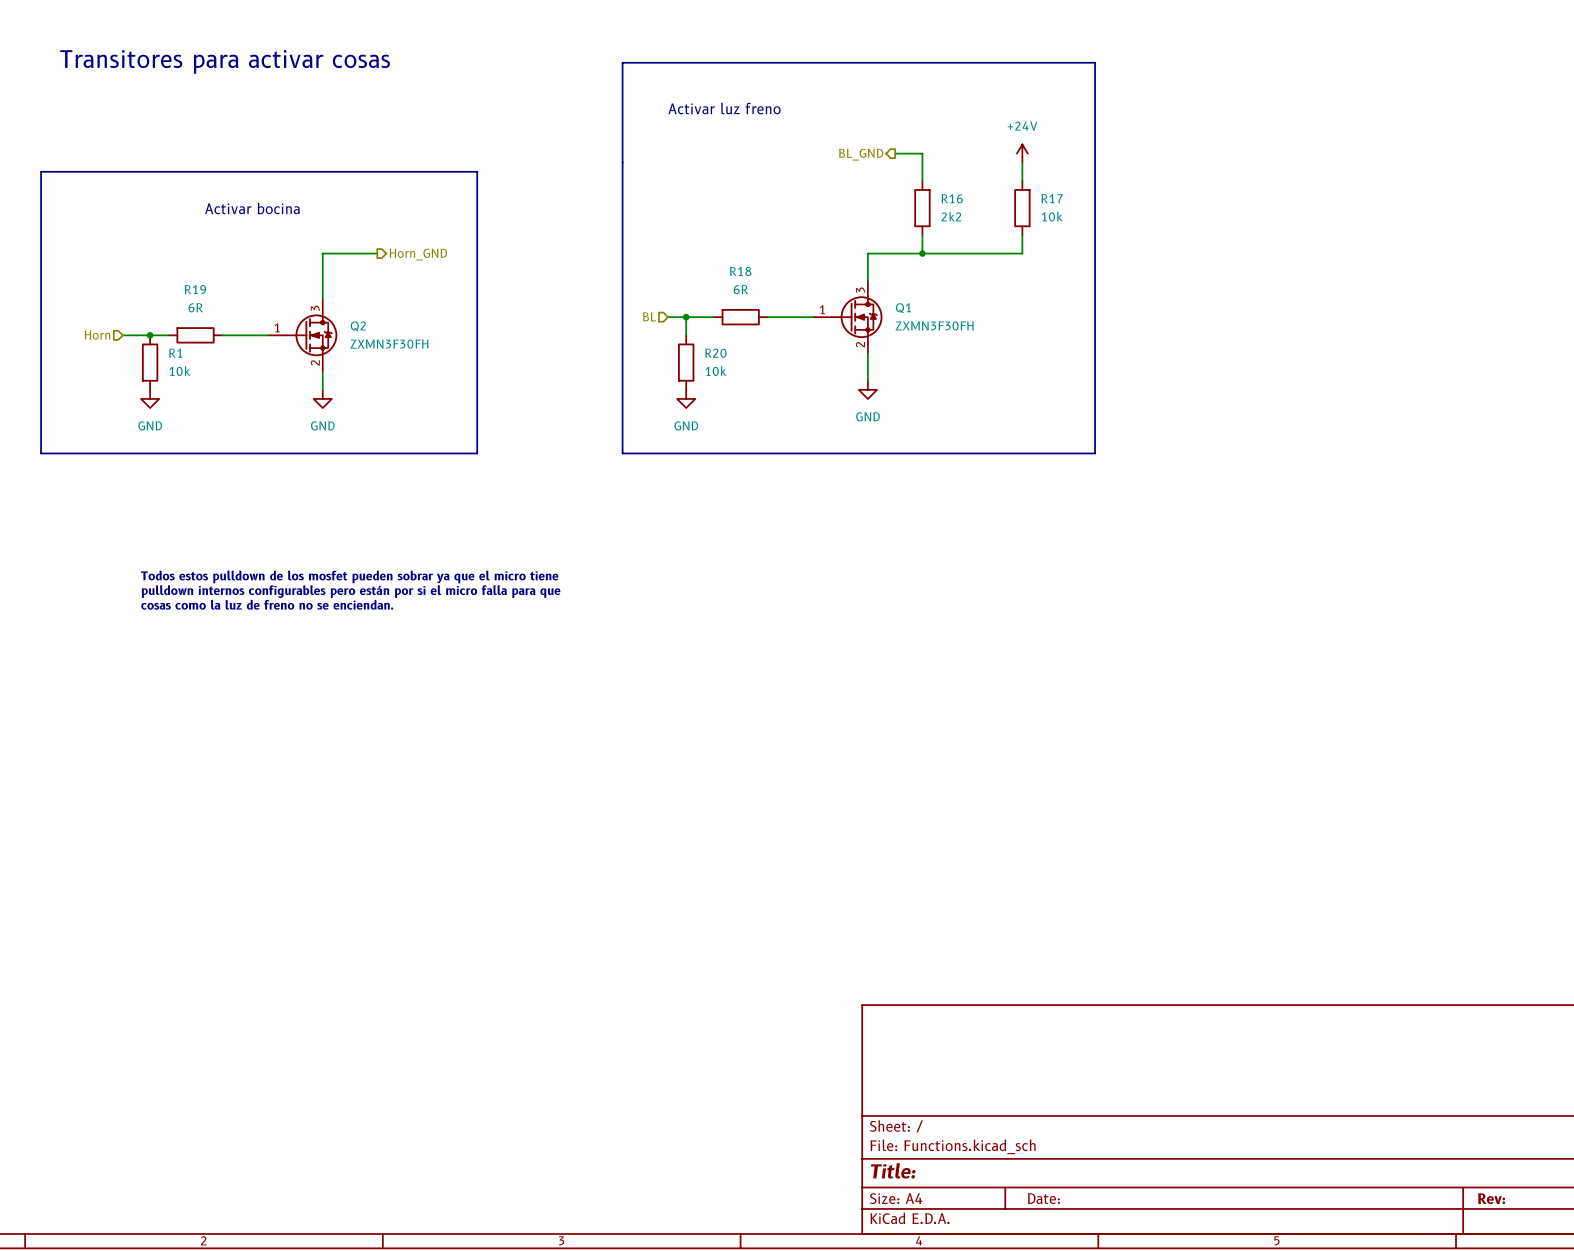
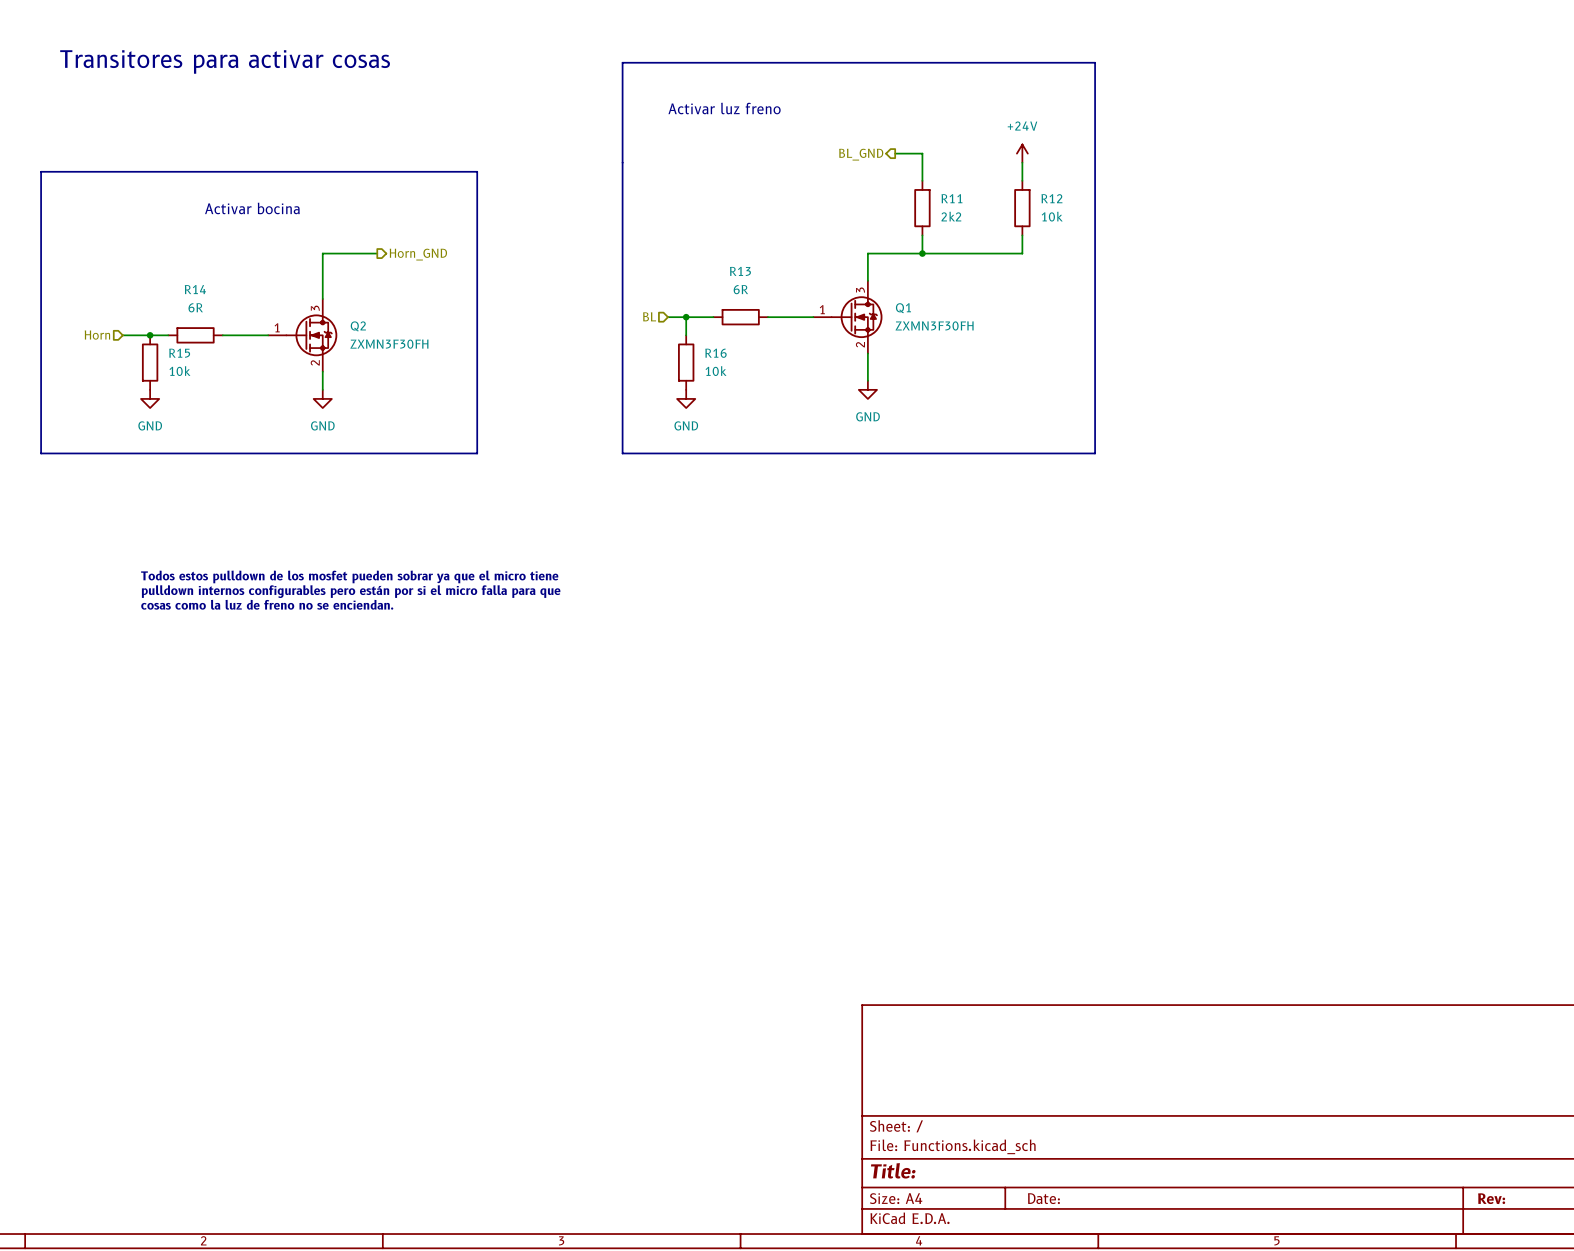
R16 name: R16 (952, 198) -> R11 (951, 198)
R17 name: R17 (1052, 198) -> R12 (1051, 198)
R18 name: R18 (740, 271) -> R13 (740, 271)
R19 name: R19 (195, 289) -> R14 (195, 289)
R1 name: R1 (175, 353) -> R15 (179, 353)
R20 name: R20 (715, 353) -> R16 (715, 353)

